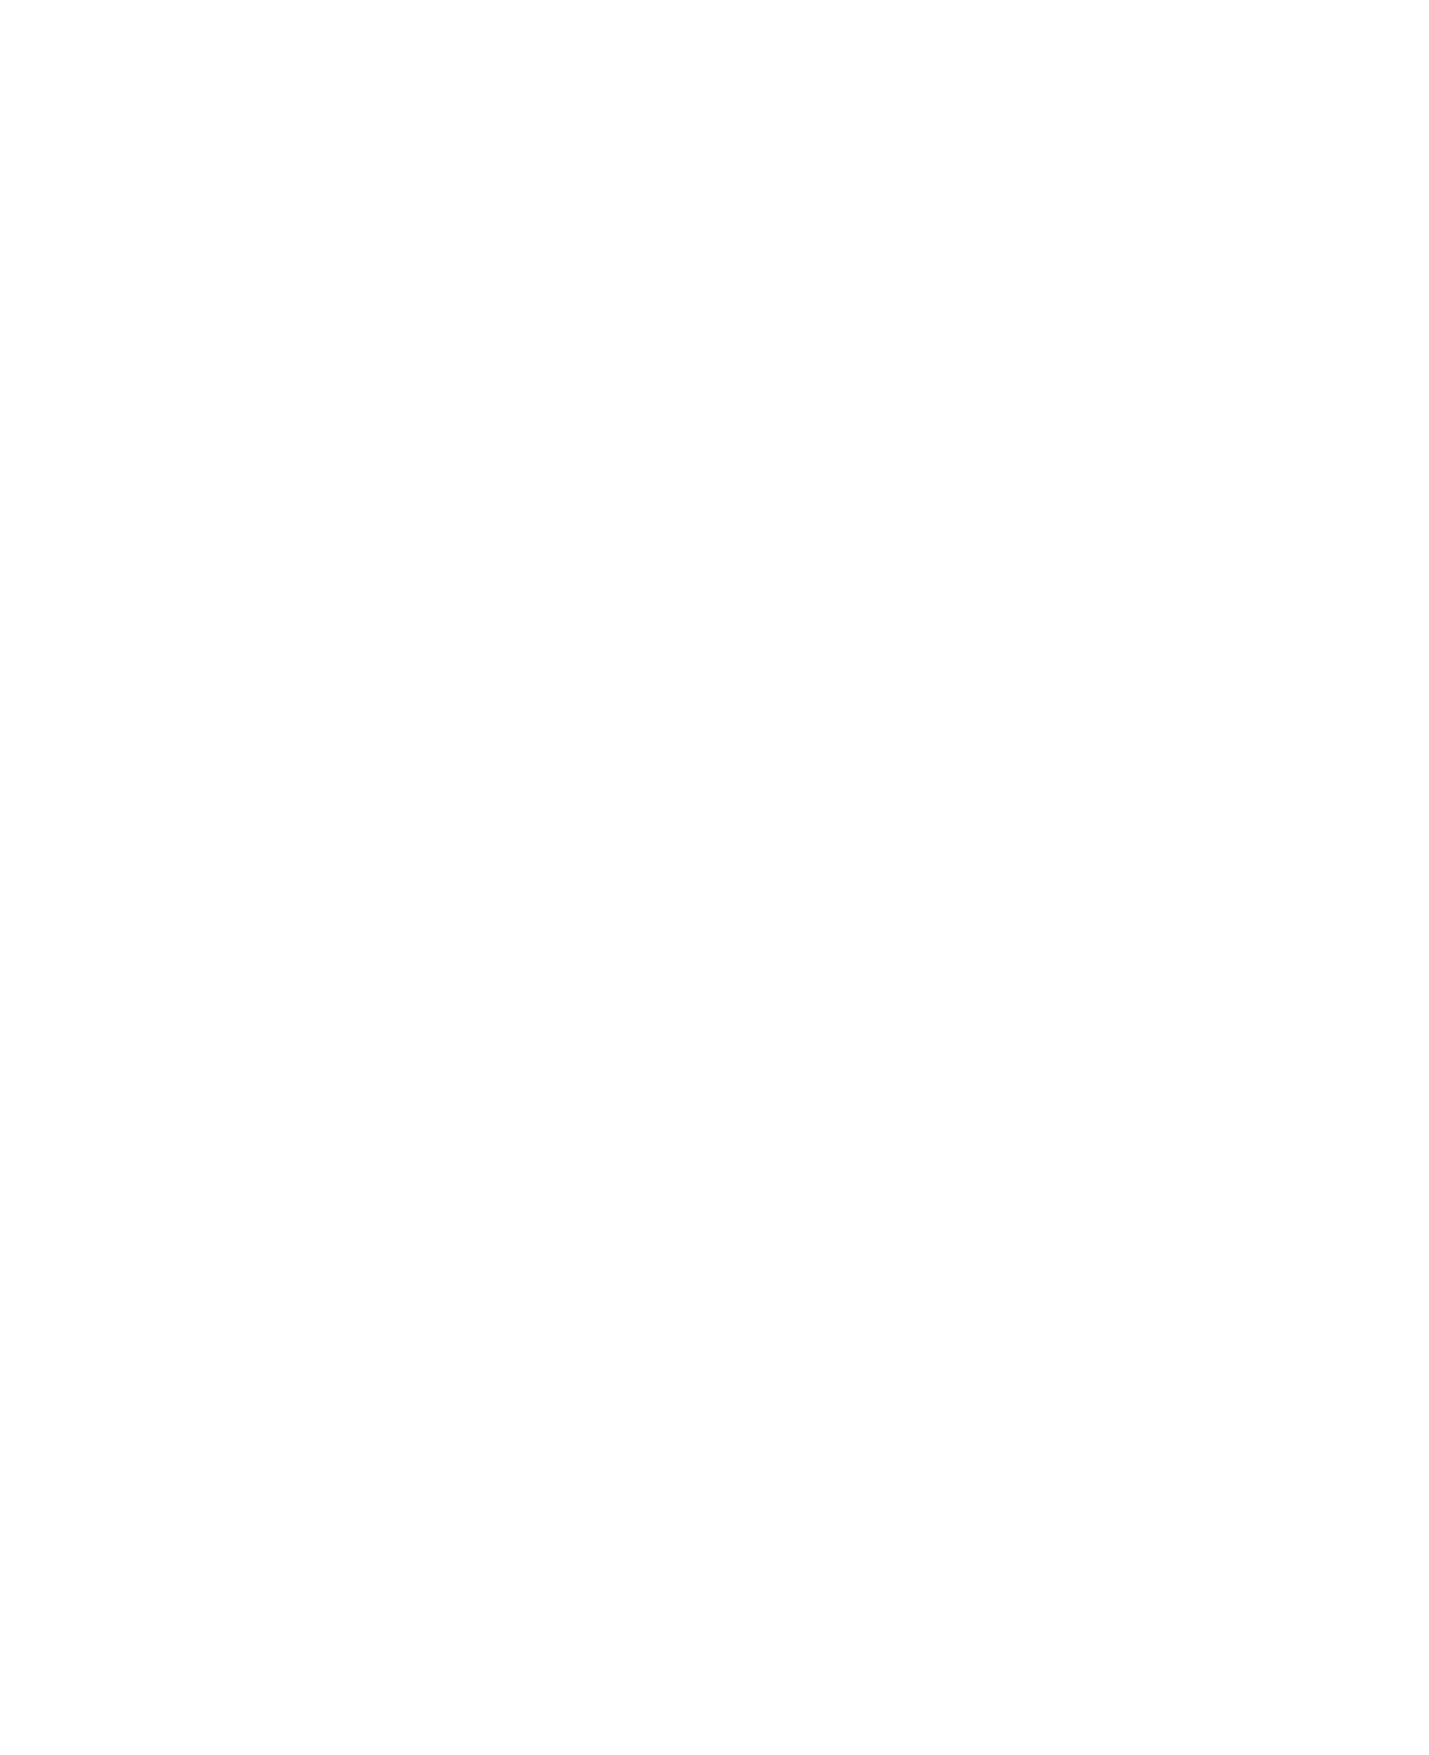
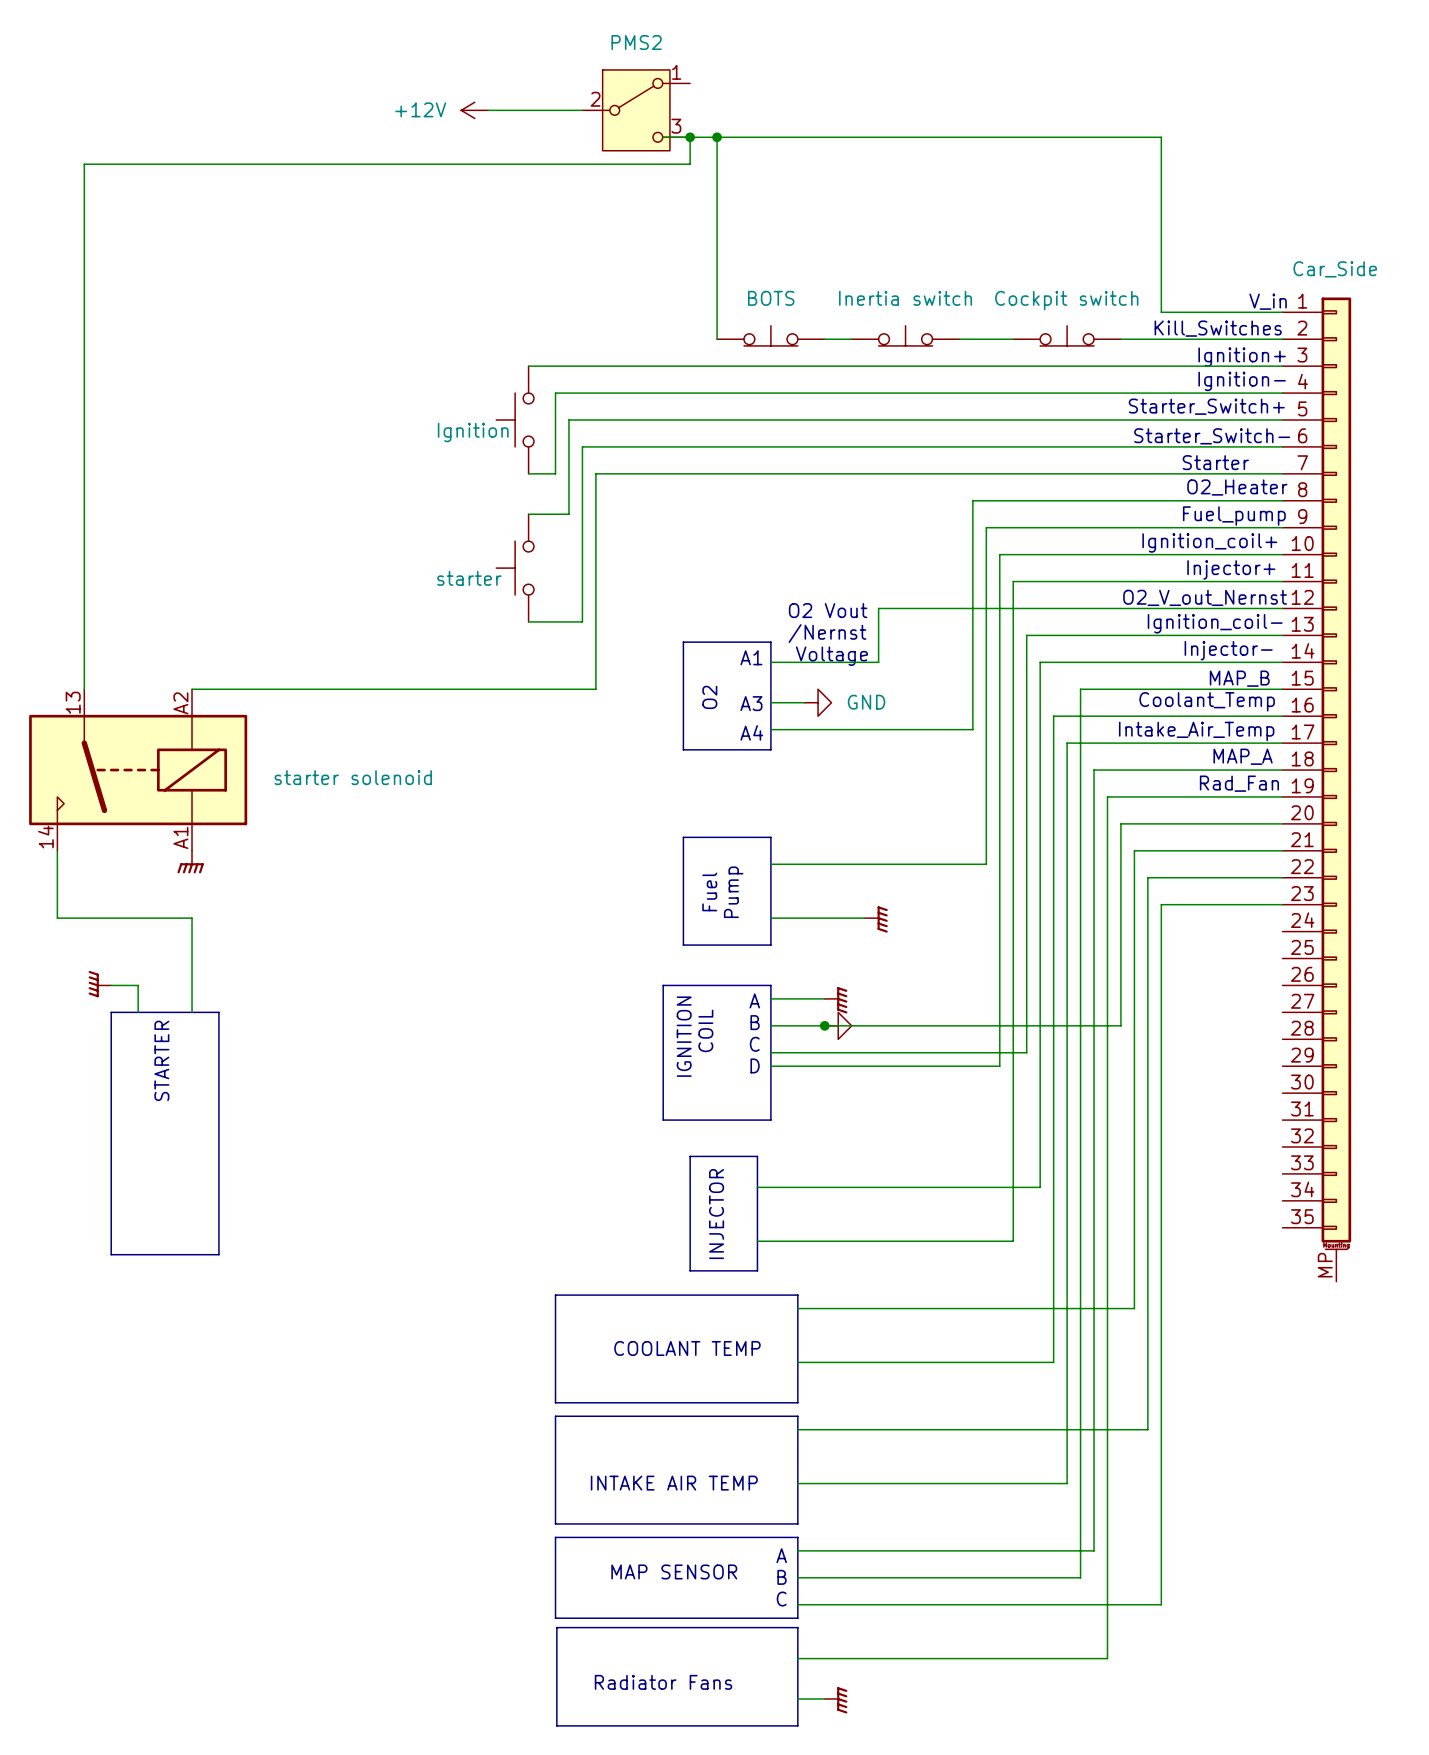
power symbol: none -> +12V (474, 110)
wire: none -> (488, 110) (582, 110)
PMS2: none -> (636, 110)
wire: none -> (663, 137) (1161, 137) (1161, 312) (1282, 312)
wire: none -> (690, 137) (690, 164) (84, 164) (84, 689)
junction: none -> (690, 137)
wire: none -> (717, 137) (717, 339)
junction: none -> (717, 137)
text: none -> V_in (1268, 301)
text: none -> Kill_Switches (1218, 328)
part: none -> BOTS (770, 335)
part: none -> Inertia switch (905, 335)
part: none -> Cockpit switch (1067, 335)
wire: none -> (824, 339) (851, 339)
wire: none -> (959, 339) (1013, 339)
wire: none -> (1120, 339) (1282, 339)
text: none -> Ignition+ (1242, 357)
wire: none -> (528, 366) (1282, 366)
text: none -> Ignition- (1242, 381)
wire: none -> (1282, 393) (555, 393) (555, 473) (528, 473)
text: none -> Starter_Switch+ (1206, 406)
part: none -> Ignition (515, 420)
wire: none -> (1282, 420) (568, 420) (568, 514) (528, 514)
text: none -> Starter_Switch- (1212, 436)
wire: none -> (1282, 446) (582, 446) (582, 621) (528, 621)
text: none -> Starter (1215, 462)
wire: none -> (1282, 473) (595, 473) (595, 689) (192, 689)
text: none -> O2_Heater (1237, 487)
wire: none -> (1282, 500) (972, 500) (972, 729) (770, 729)
text: none -> Fuel_pump (1234, 516)
wire: none -> (1282, 527) (986, 527) (986, 864) (770, 864)
text: none -> Ignition_coil+ (1209, 542)
wire: none -> (1282, 554) (999, 554) (999, 1066) (770, 1066)
part: none -> starter (515, 568)
text: none -> Injector+ (1231, 569)
wire: none -> (1282, 581) (1013, 581) (1013, 1241) (757, 1241)
text: none -> O2_V_out_Nernst (1205, 597)
wire: none -> (1282, 608) (878, 608) (878, 662) (770, 662)
text: none -> O2 Vout (828, 610)
text: none -> Ignition_coil- (1215, 623)
text: none -> /Nernst (827, 633)
wire: none -> (1282, 635) (1026, 635) (1026, 1052) (770, 1052)
line: none -> (683, 642) (683, 749) (770, 749) (770, 642) (683, 642)
text: none -> Injector- (1228, 650)
text: none -> Voltage (831, 656)
text: none -> A1 (751, 657)
wire: none -> (1282, 662) (1040, 662) (1040, 1187) (757, 1187)
text: none -> MAP_B (1239, 678)
wire: none -> (1282, 689) (1080, 689) (1080, 1577) (797, 1577)
text: none -> O2 (709, 697)
text: none -> Coolant_Temp (1207, 701)
wire: none -> (770, 702) (804, 702)
power symbol: none -> GND (818, 702)
text: none -> A3 (751, 703)
wire: none -> (1282, 716) (1053, 716) (1053, 1362) (797, 1362)
text: none -> Intake_Air_Temp (1196, 731)
text: none -> A4 (751, 732)
wire: none -> (1282, 743) (1067, 743) (1067, 1483) (797, 1483)
text: none -> MAP_A (1243, 756)
part: none -> starter solenoid (138, 770)
wire: none -> (1282, 770) (1094, 770) (1094, 1550) (797, 1550)
text: none -> Rad_Fan (1239, 783)
part: none -> Car_Side (1316, 789)
wire: none -> (1282, 796) (1107, 796) (1107, 1658) (797, 1658)
wire: none -> (1282, 823) (1120, 823) (1120, 1025) (770, 1025)
line: none -> (683, 837) (770, 837) (770, 945) (683, 945) (683, 837)
wire: none -> (57, 850) (57, 918) (192, 918) (192, 1012)
wire: none -> (1282, 850) (1134, 850) (1134, 1308) (797, 1308)
power symbol: none -> (190, 862)
wire: none -> (1282, 877) (1147, 877) (1147, 1429) (797, 1429)
text: none -> Fuel (709, 891)
text: none -> Pump (733, 892)
wire: none -> (1282, 904) (1161, 904) (1161, 1604) (797, 1604)
wire: none -> (770, 918) (865, 918)
power symbol: none -> (876, 919)
power symbol: none -> (99, 984)
wire: none -> (111, 985) (138, 985) (138, 1012)
line: none -> (663, 985) (770, 985) (770, 1120) (663, 1120) (663, 985)
wire: none -> (770, 998) (824, 998)
text: none -> A (754, 1000)
power symbol: none -> (836, 1000)
line: none -> (111, 1012) (218, 1012) (218, 1254) (111, 1254) (111, 1012)
text: none -> B (755, 1022)
junction: none -> (824, 1025)
power symbol: none -> (838, 1025)
text: none -> COIL (705, 1030)
text: none -> IGNITION (684, 1036)
text: none -> C (754, 1044)
text: none -> STARTER (161, 1060)
text: none -> D (755, 1065)
line: none -> (690, 1156) (757, 1156) (757, 1270) (690, 1270) (690, 1156)
text: none -> INJECTOR (716, 1214)
line: none -> (555, 1295) (555, 1402) (797, 1402) (797, 1295) (555, 1295)
text: none -> COOLANT TEMP (687, 1348)
line: none -> (555, 1416) (555, 1523) (797, 1523) (797, 1416) (555, 1416)
text: none -> INTAKE AIR TEMP (674, 1483)
line: none -> (555, 1537) (797, 1537) (797, 1618) (555, 1618) (555, 1537)
text: none -> A (781, 1555)
text: none -> MAP SENSOR (674, 1571)
text: none -> B (782, 1577)
text: none -> C (781, 1599)
line: none -> (556, 1627) (797, 1627) (797, 1725) (556, 1725) (556, 1627)
text: none -> Radiator Fans (663, 1682)
wire: none -> (797, 1698) (824, 1698)
power symbol: none -> (836, 1700)

